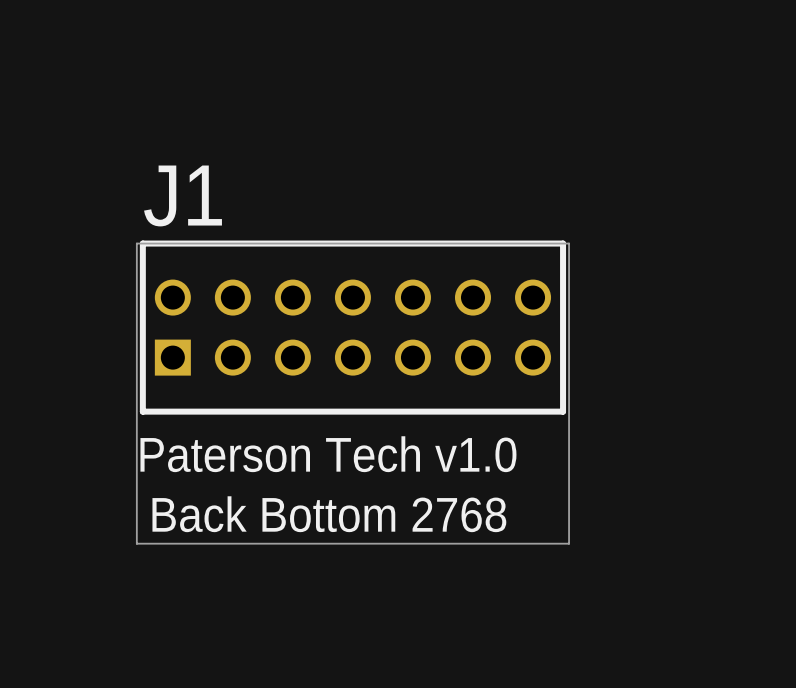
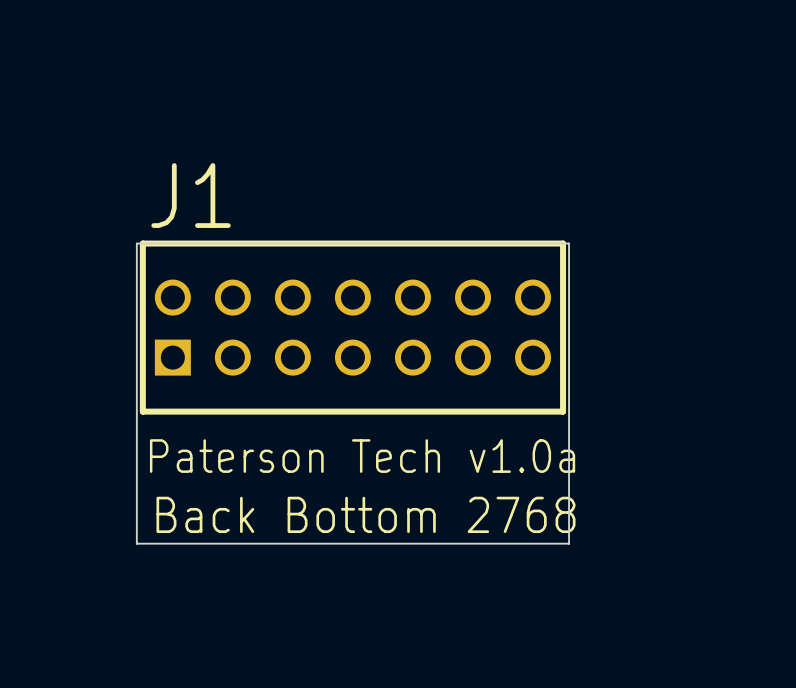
text: Paterson Tech v1.0 (328, 454) -> Paterson Tech v1.0a (362, 456)

